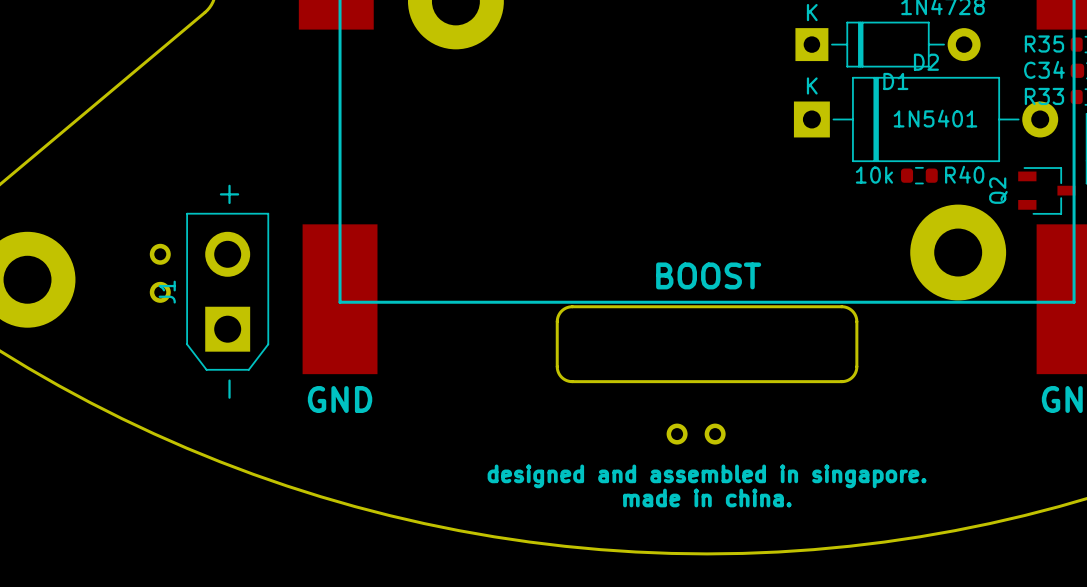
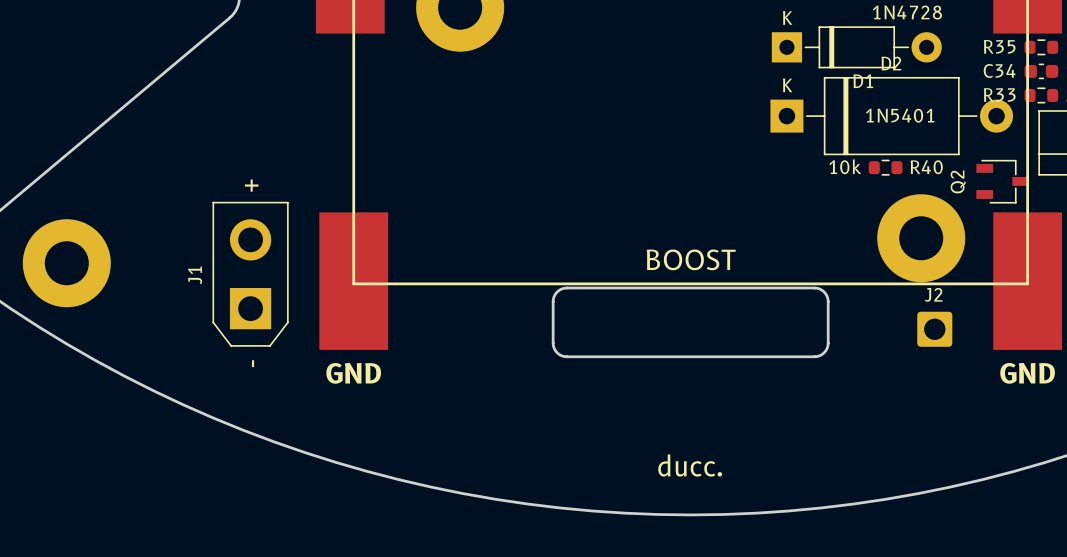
part: (160, 273) -> none
J2: none -> (934, 329)
part: (696, 434) -> none
text: designed and assembled in singapore. (707, 476) -> none
text: made in china. (707, 497) -> ducc. (690, 465)

